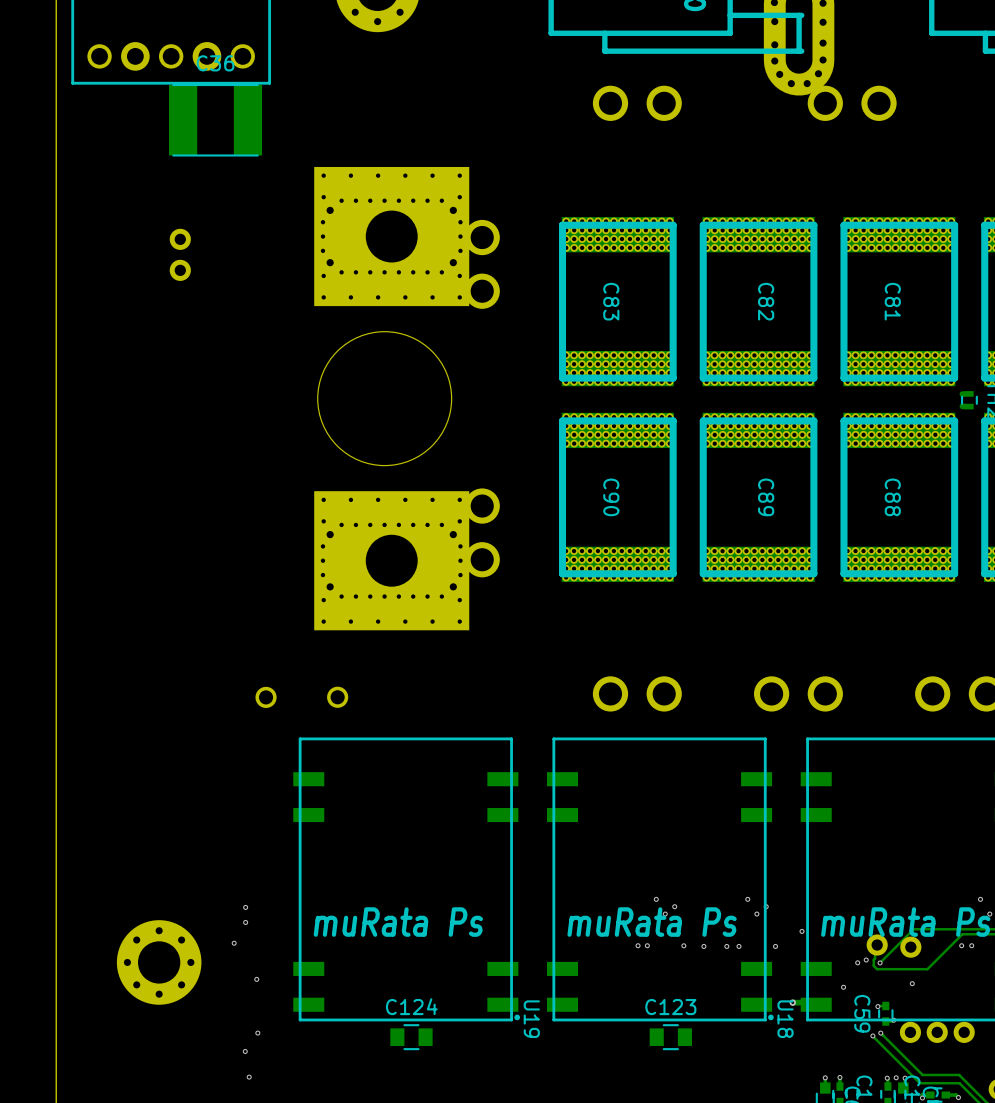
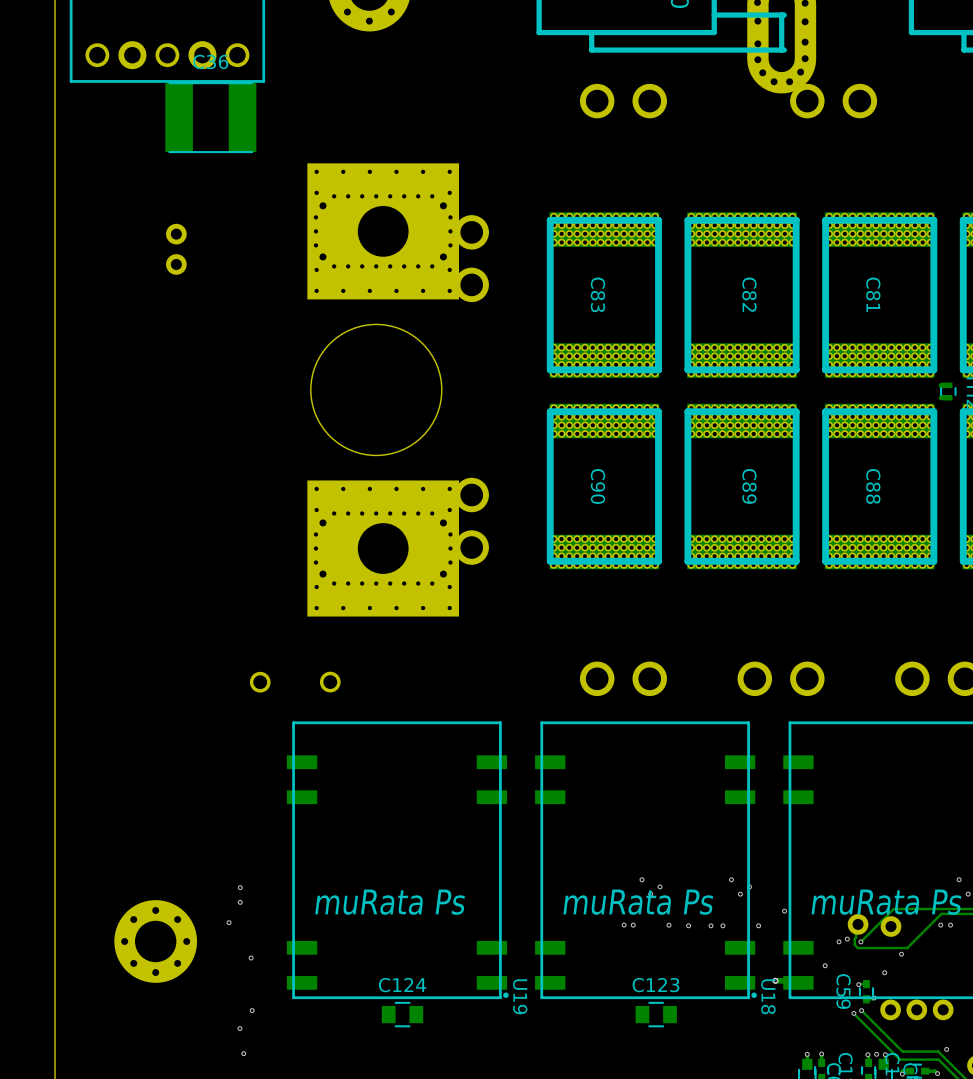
via: none -> (901, 954)
via: (912, 983) -> none
via: none -> (884, 972)
via: none -> (946, 1049)

